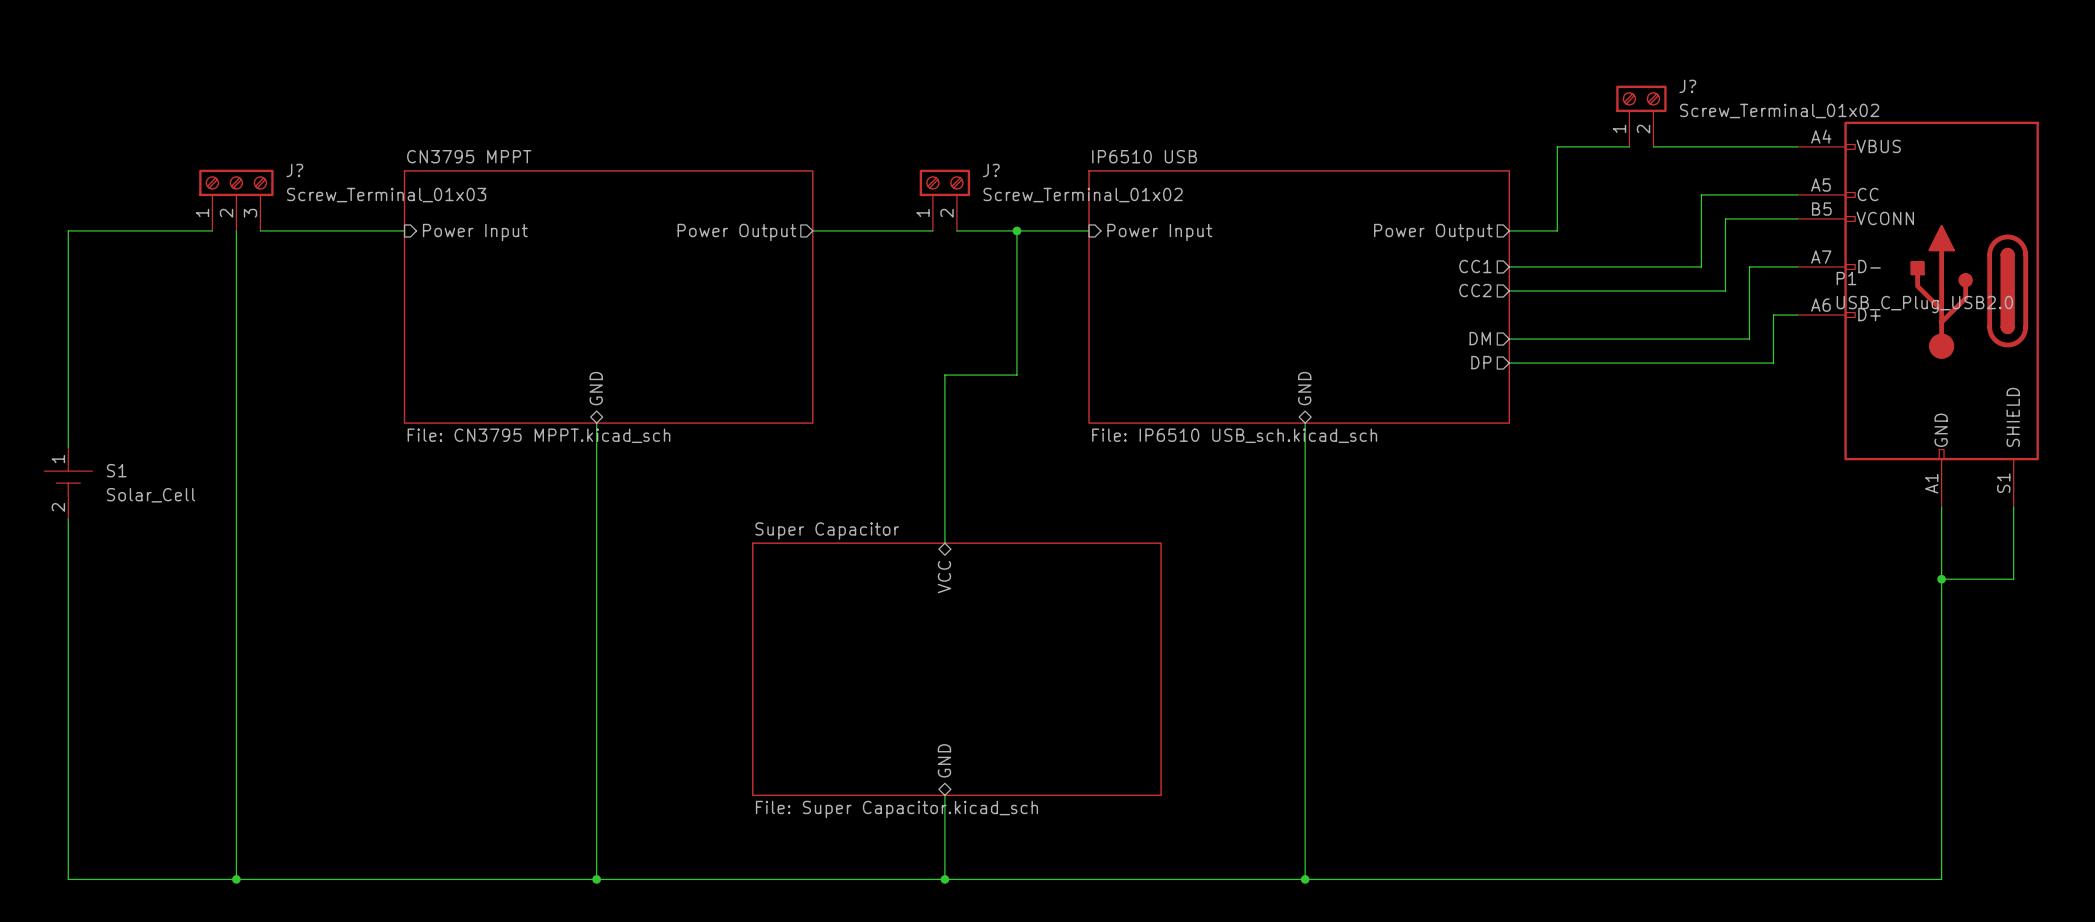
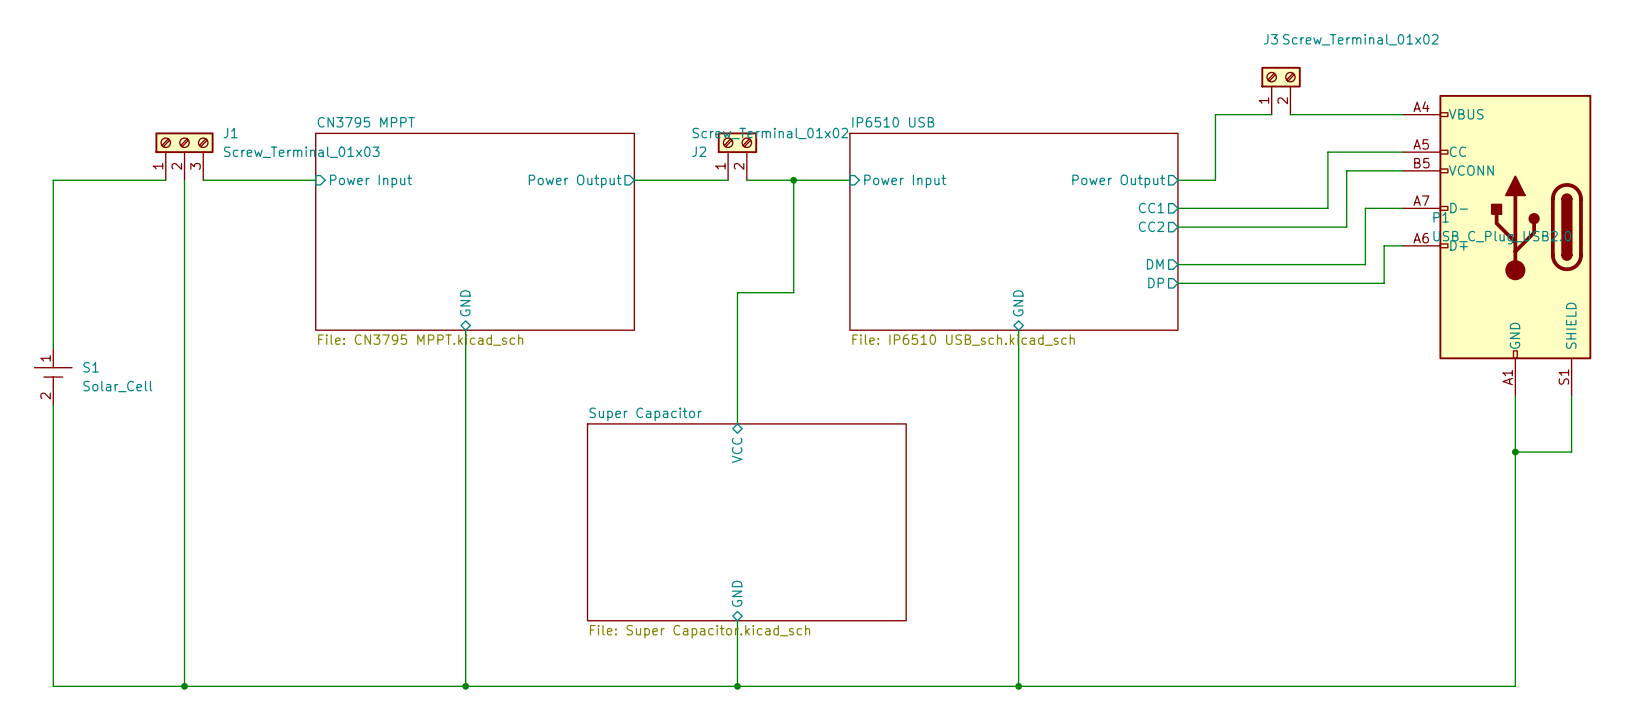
J? name: J? (1687, 86) -> J3 (1270, 39)
J? value position: Screw_Terminal_01x02 (1779, 110) -> Screw_Terminal_01x02 (1360, 39)
J? name: J? (294, 170) -> J1 (230, 133)
J? name: J? (991, 170) -> J2 (699, 151)
J? value position: Screw_Terminal_01x02 (1083, 195) -> Screw_Terminal_01x02 (770, 133)

